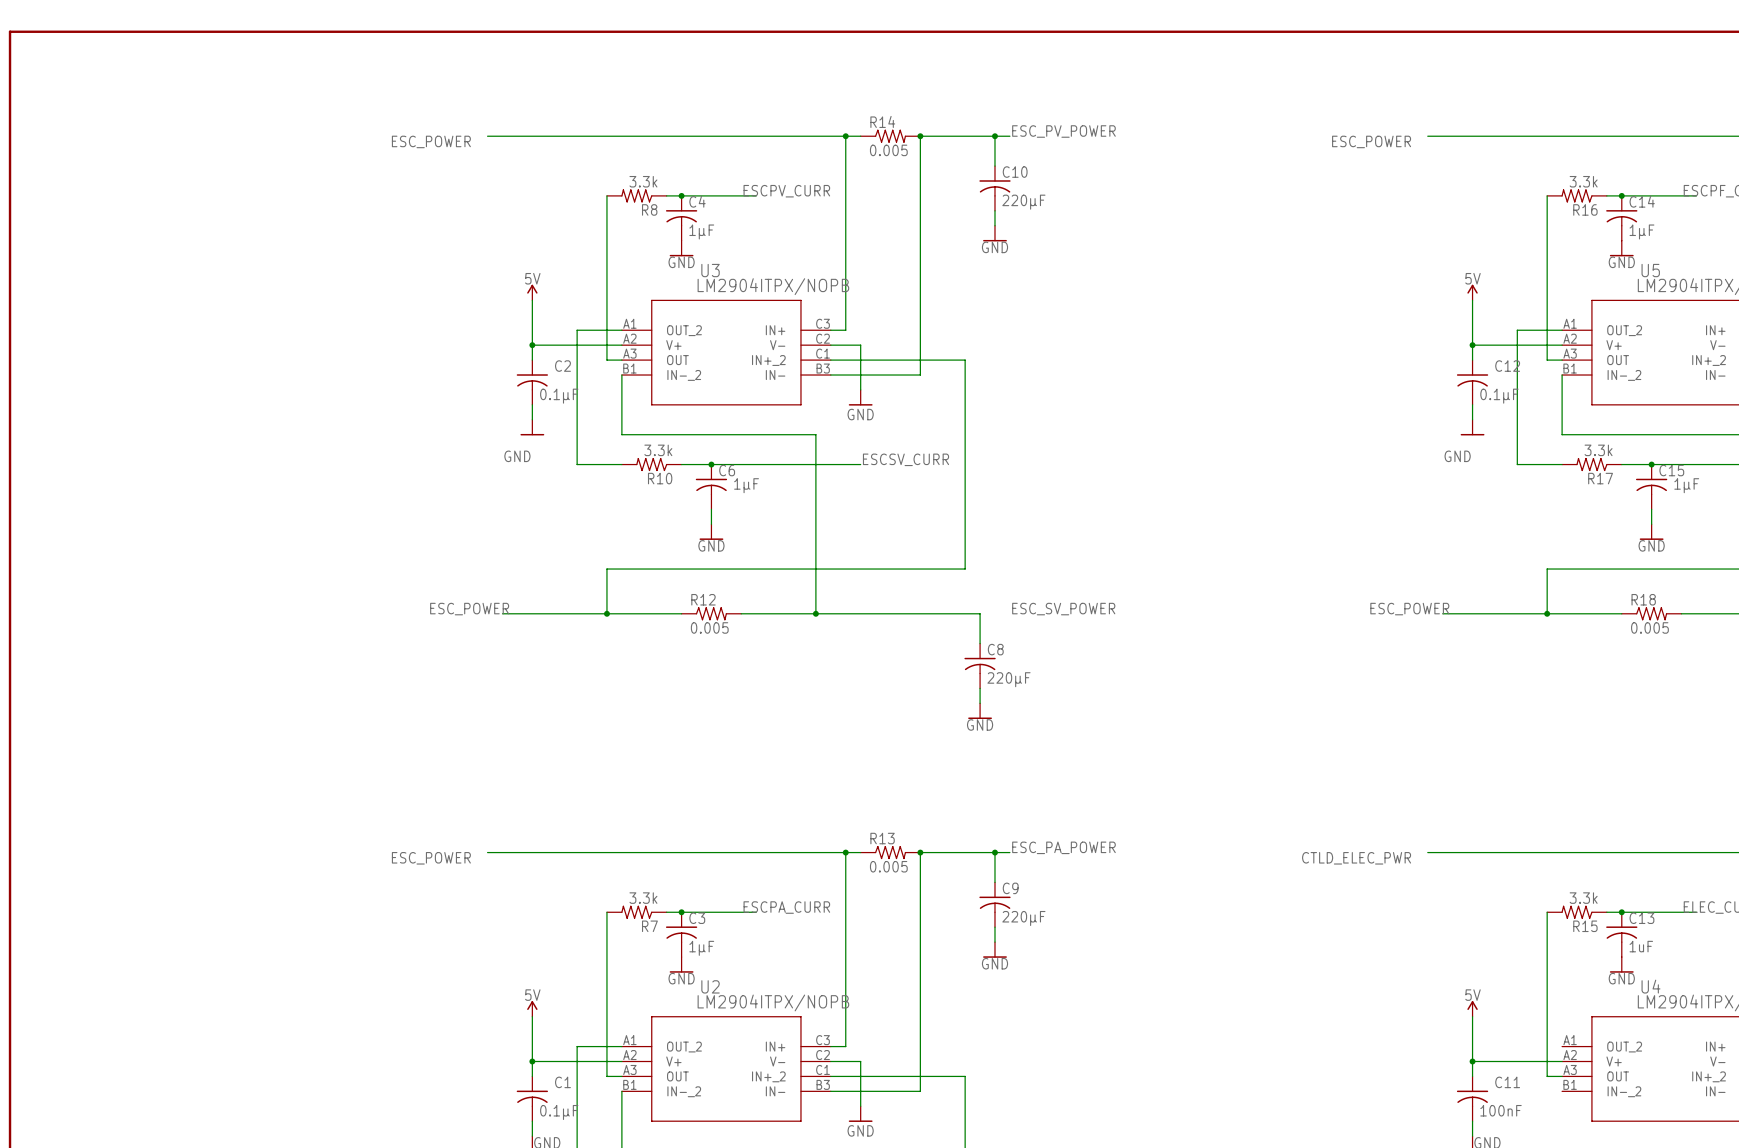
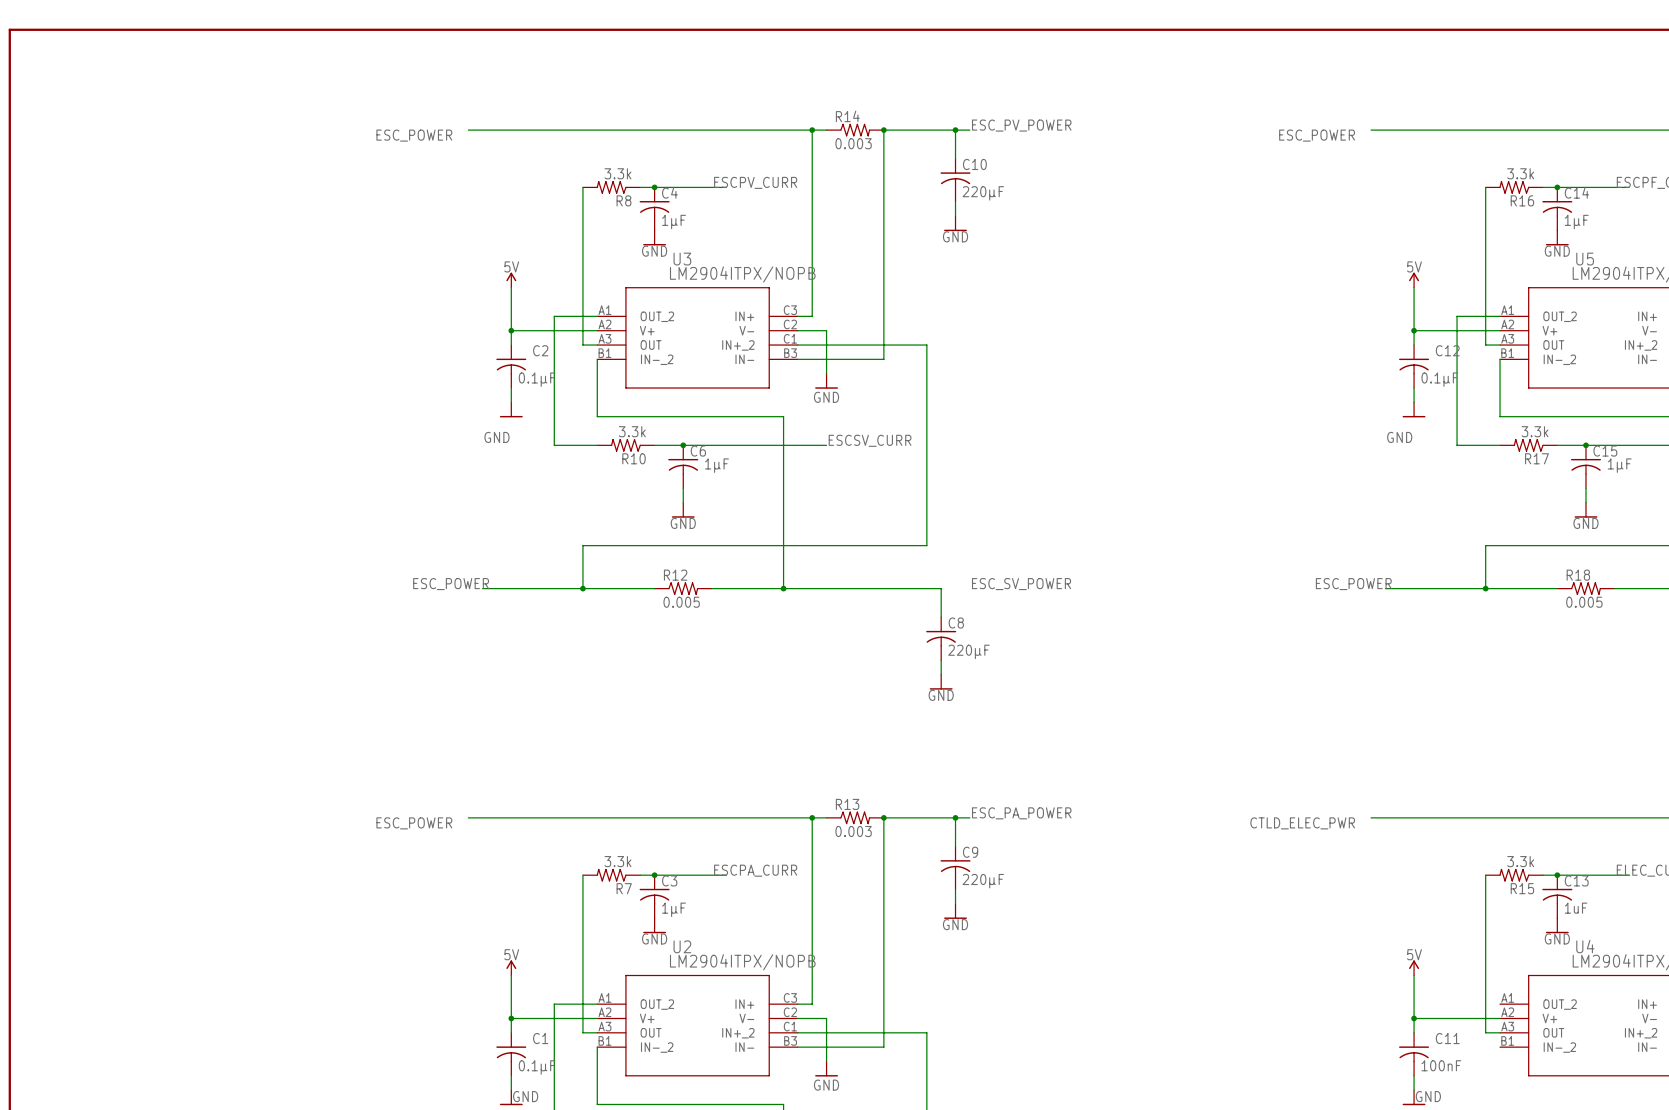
R14 value: 0.005 (888, 150) -> 0.003 (853, 143)
R13 value: 0.005 (888, 866) -> 0.003 (853, 831)

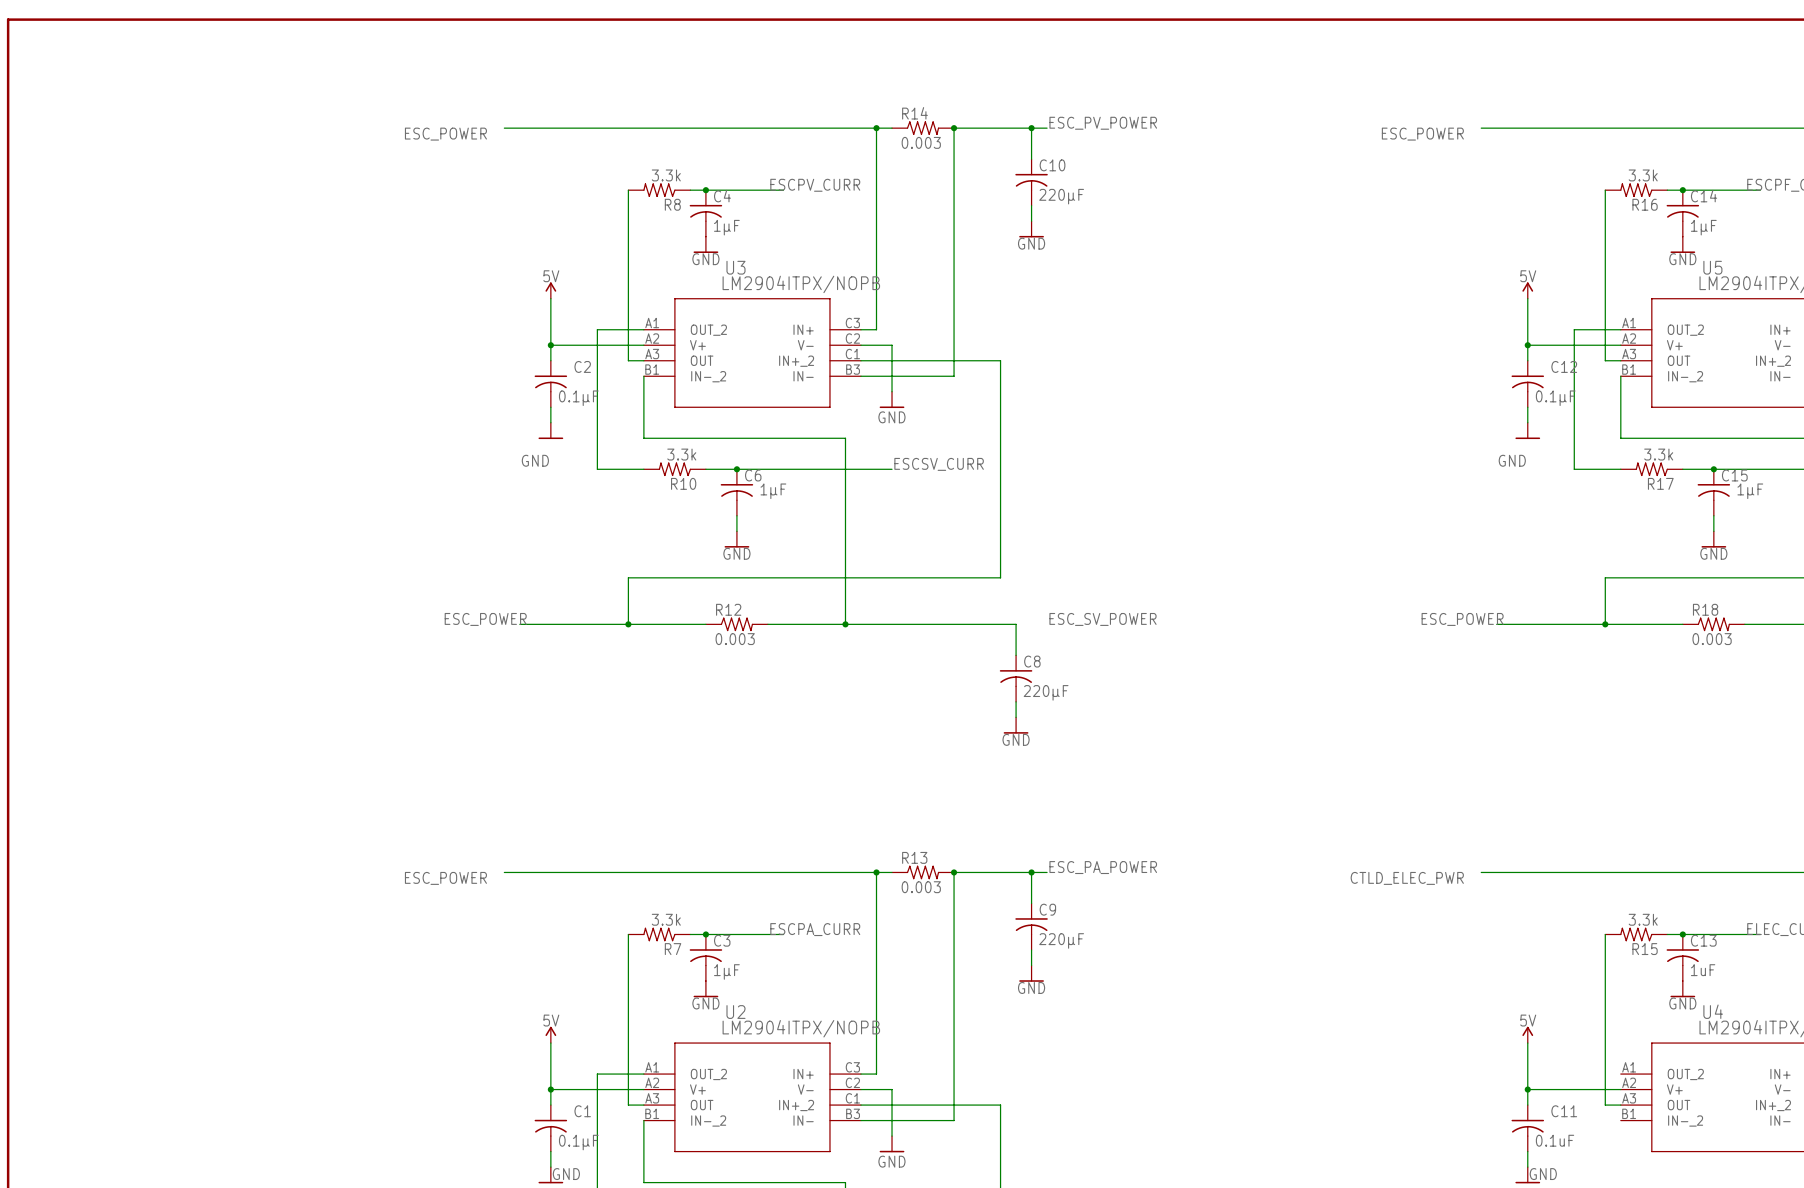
R12 value: 0.005 (681, 602) -> 0.003 (735, 639)
R18 value: 0.005 (1584, 602) -> 0.003 (1712, 639)
C11 value: 100nF (1441, 1065) -> 0.1uF (1555, 1140)

